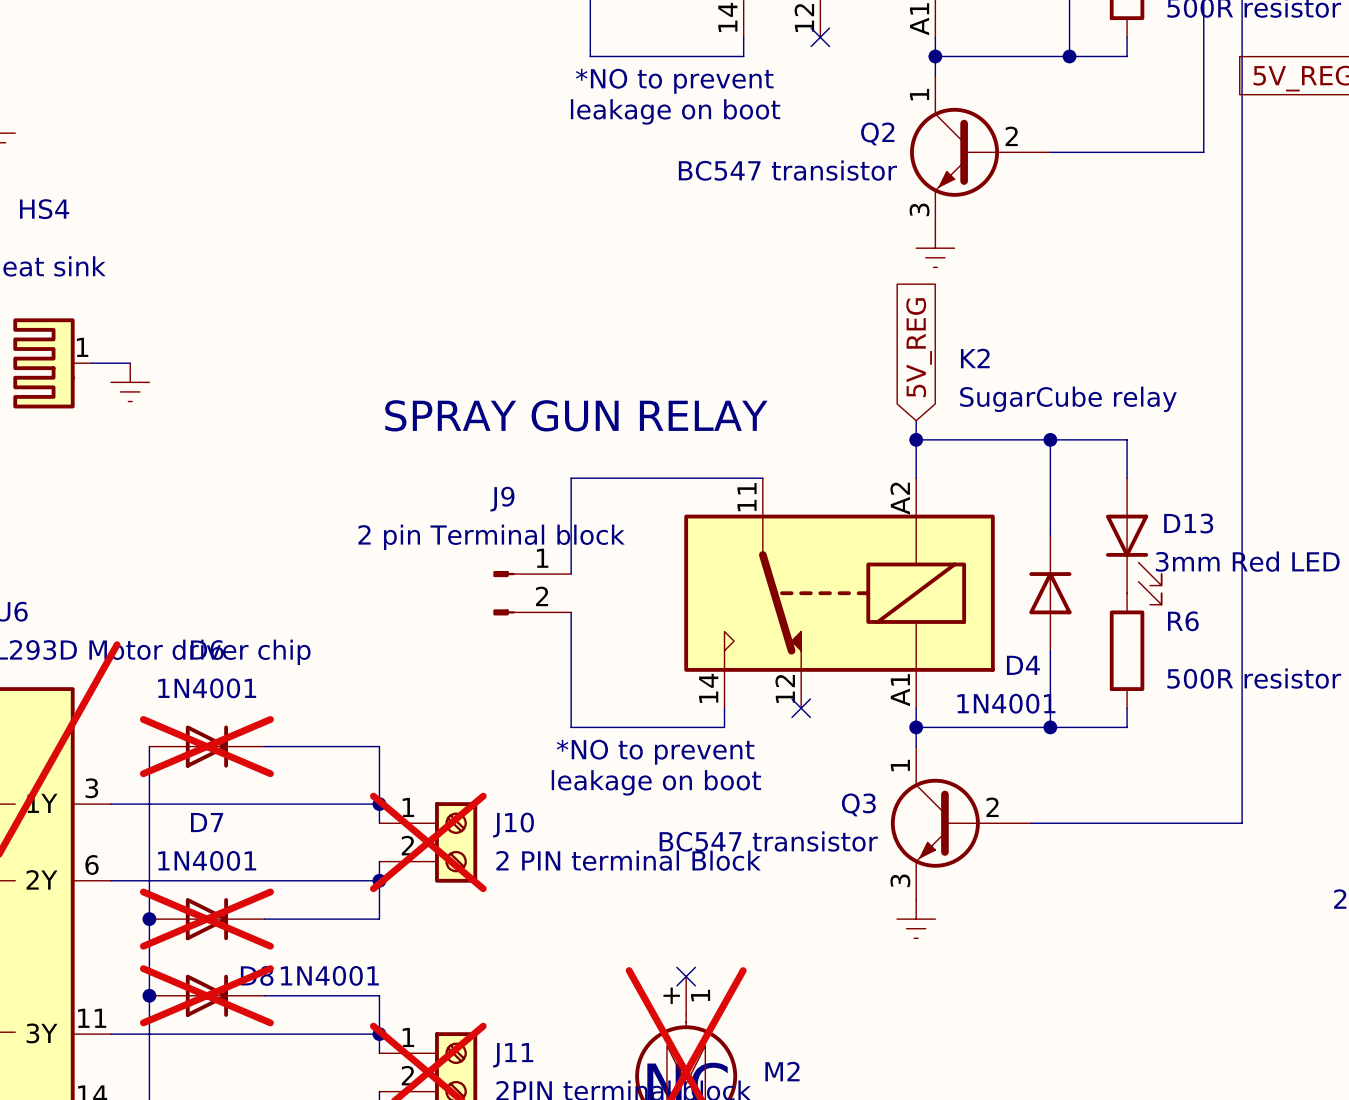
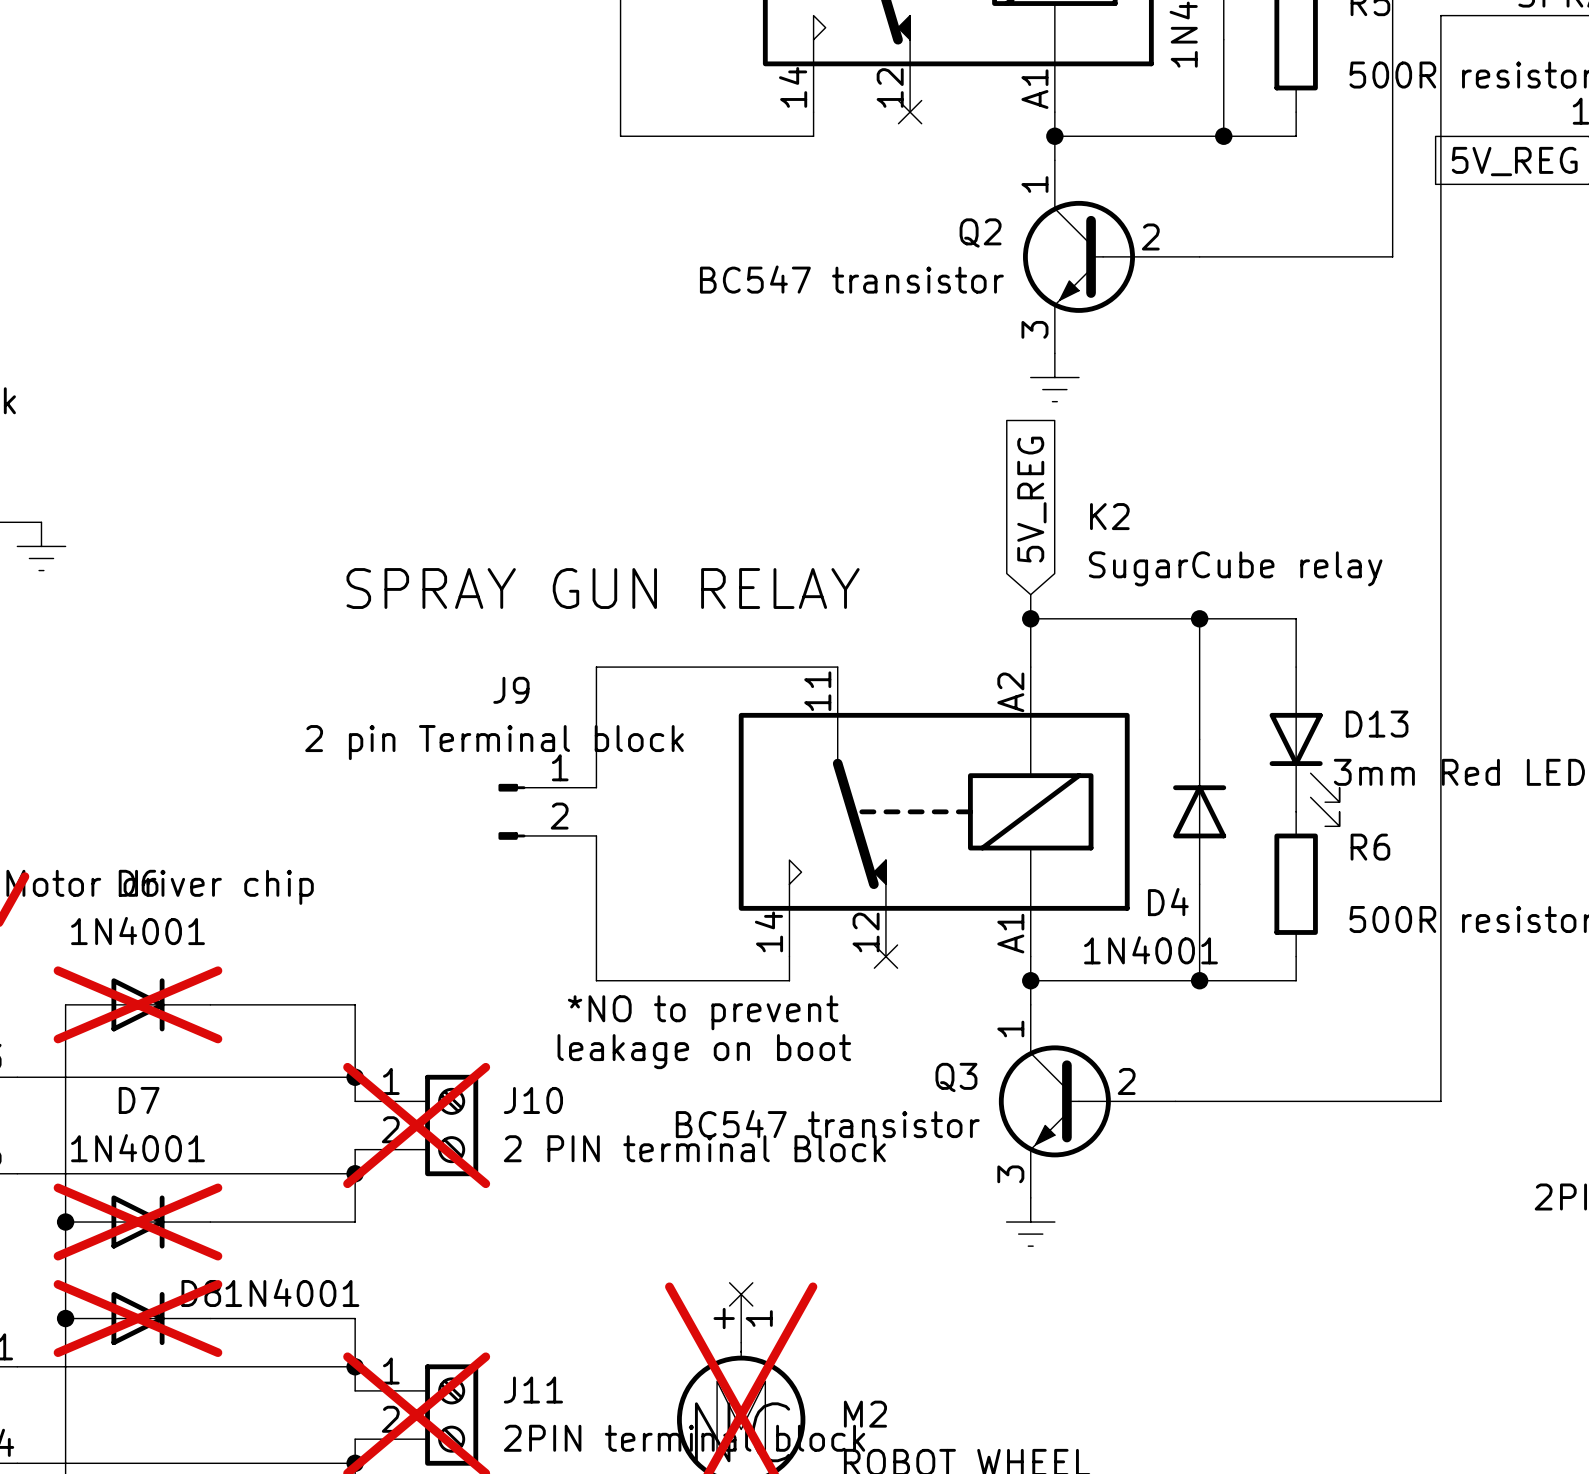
text: *NO to prevent (674, 81) -> none
text: leakage on boot (675, 111) -> none

